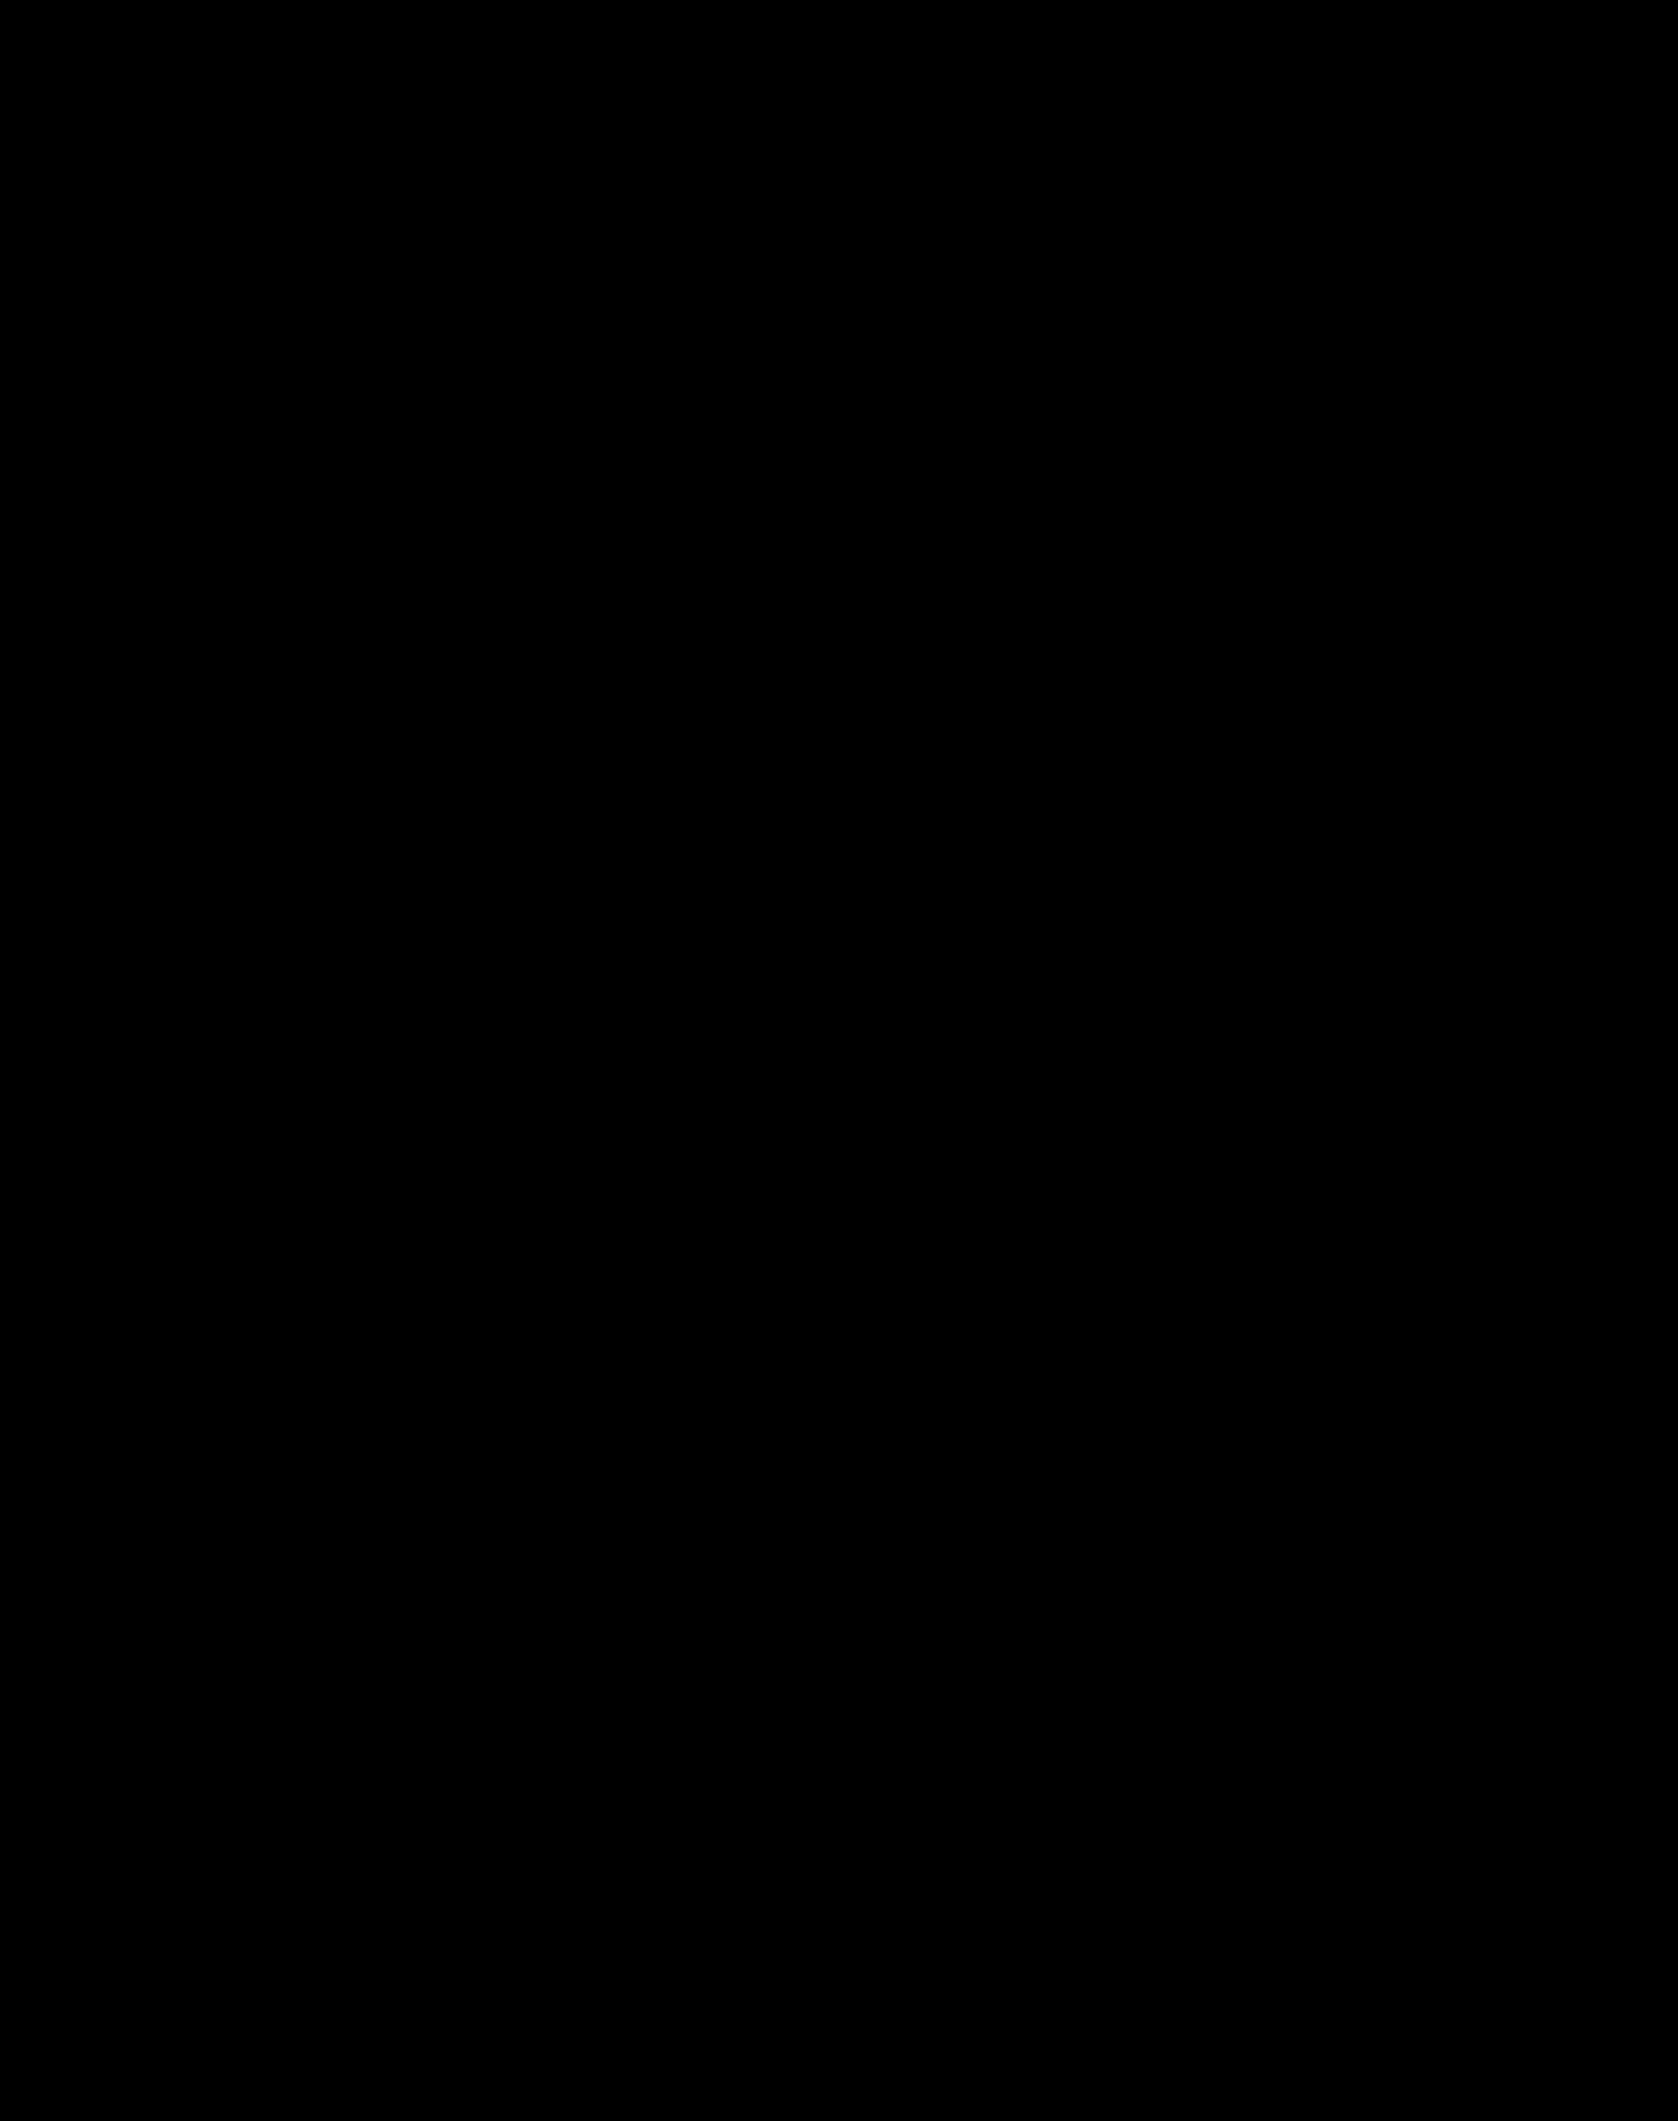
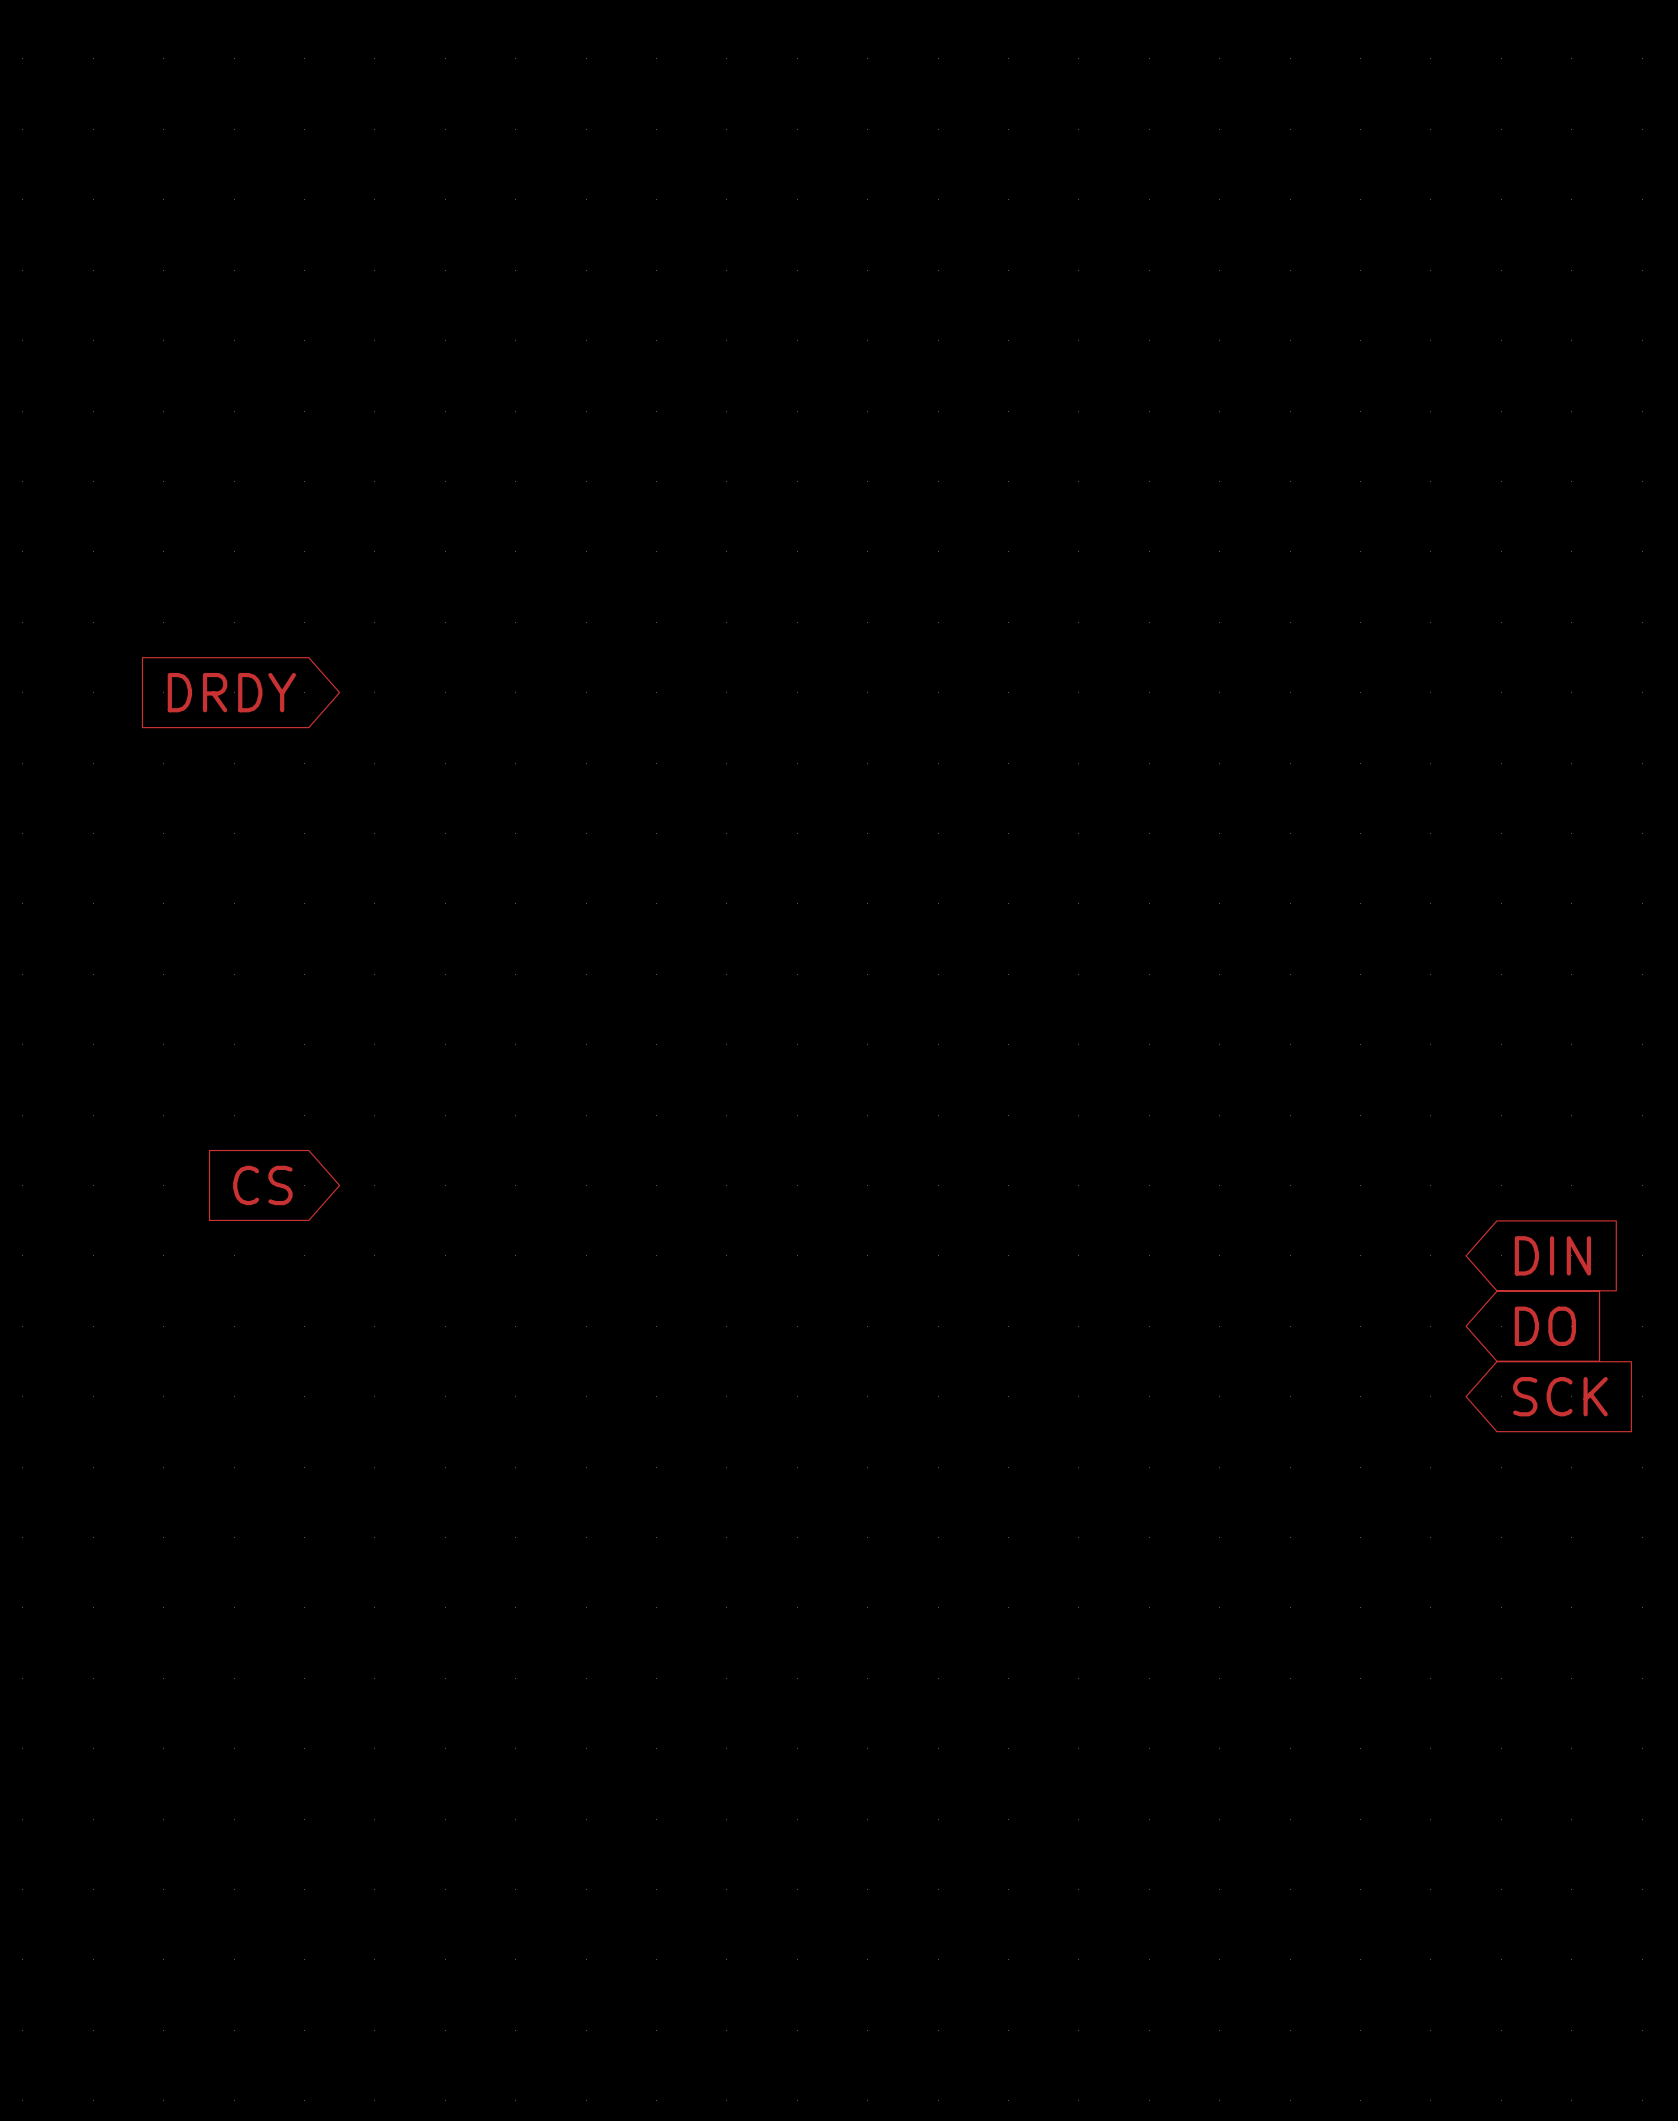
global label: none -> DRDY (231, 692)
global label: none -> CS (262, 1185)
global label: none -> DIN (1552, 1255)
global label: none -> DO (1545, 1326)
global label: none -> SCK (1560, 1396)

